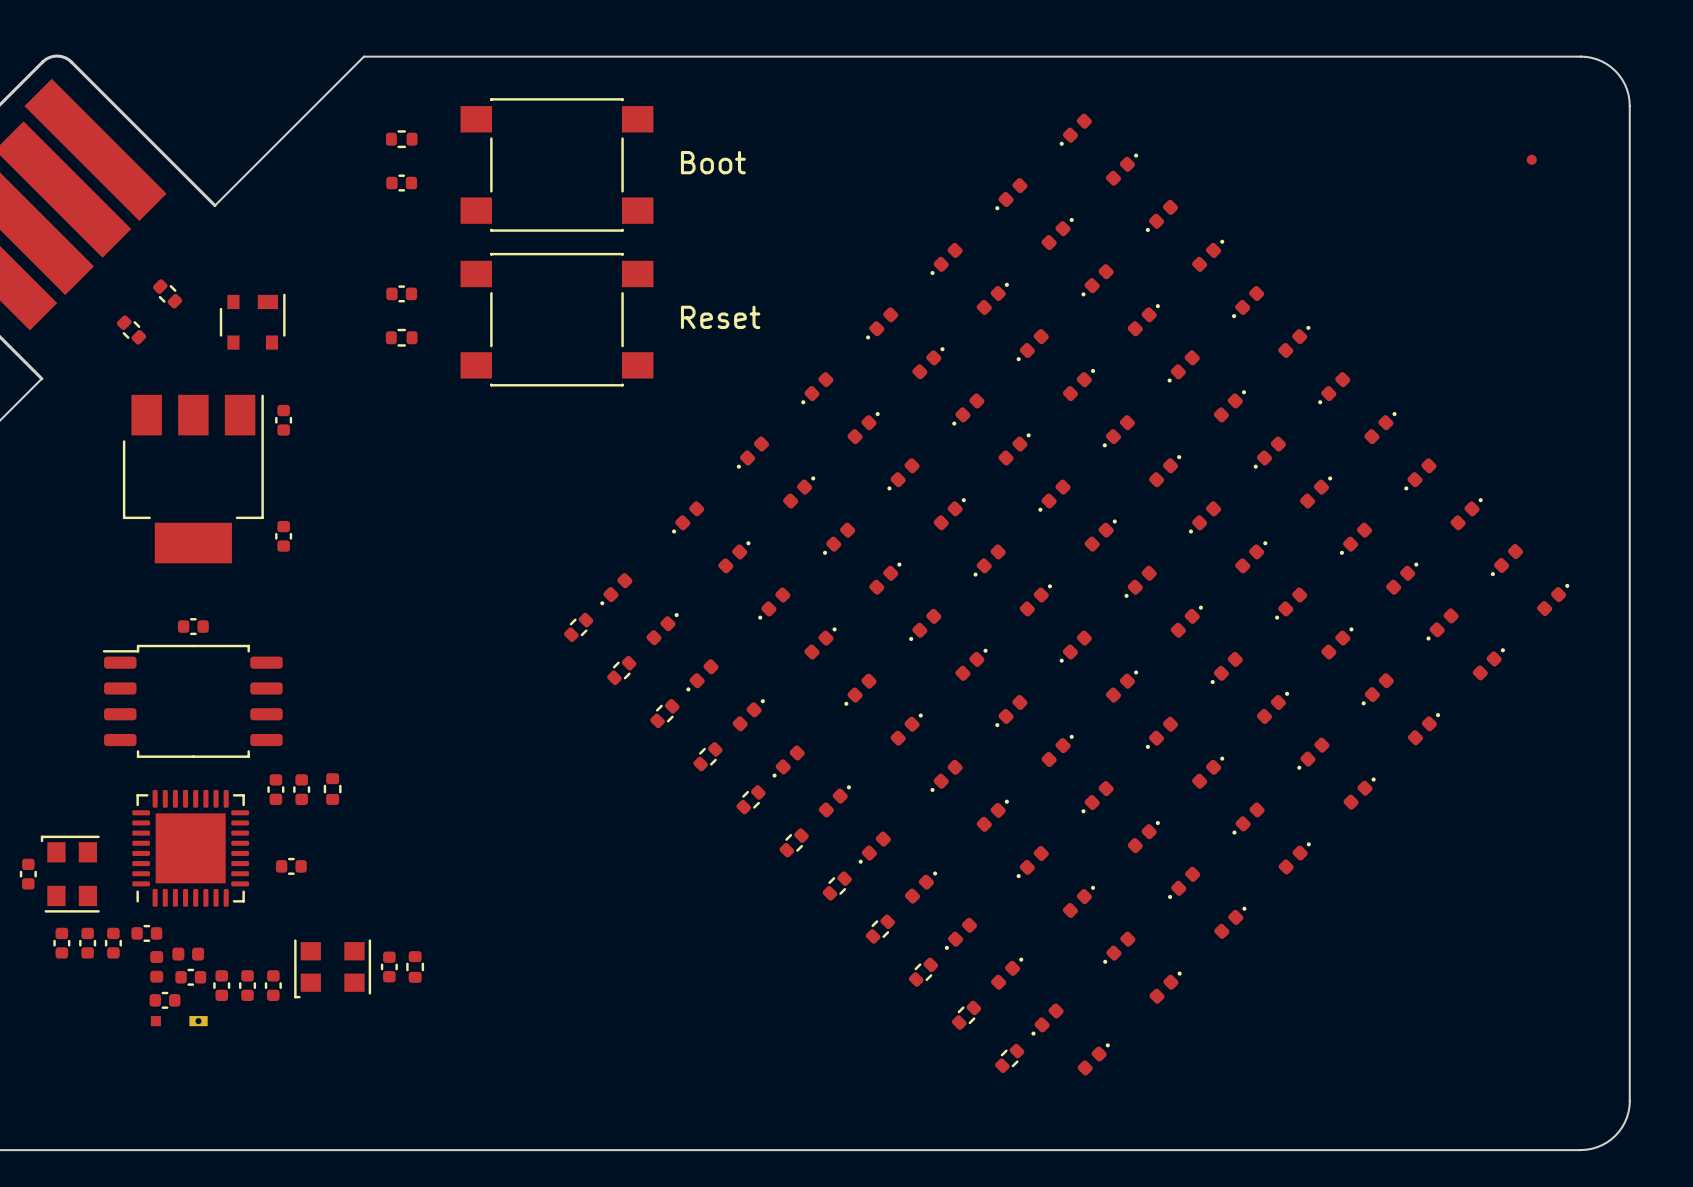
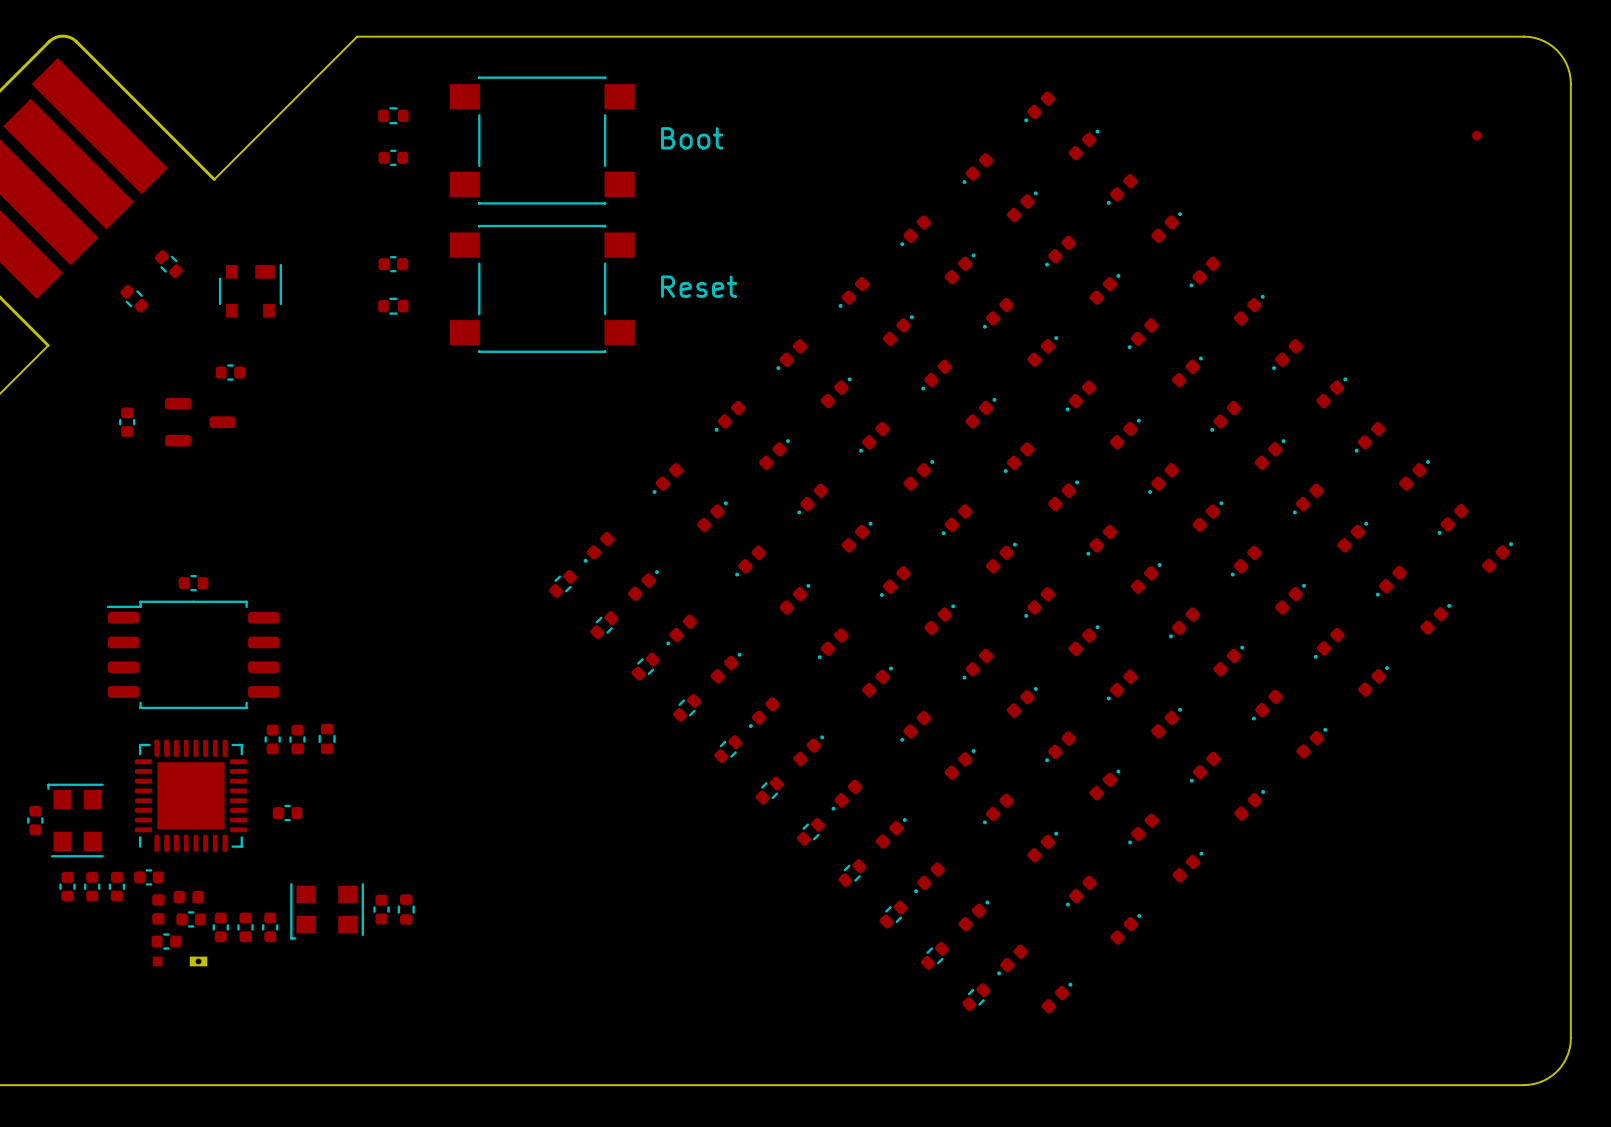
part rotation: 0° (283, 420) -> 90° clockwise (230, 372)
part position: (283, 420) -> (230, 372)
part: none -> (127, 422)
part: none -> (200, 422)
part: (193, 478) -> none
part: (283, 536) -> none

